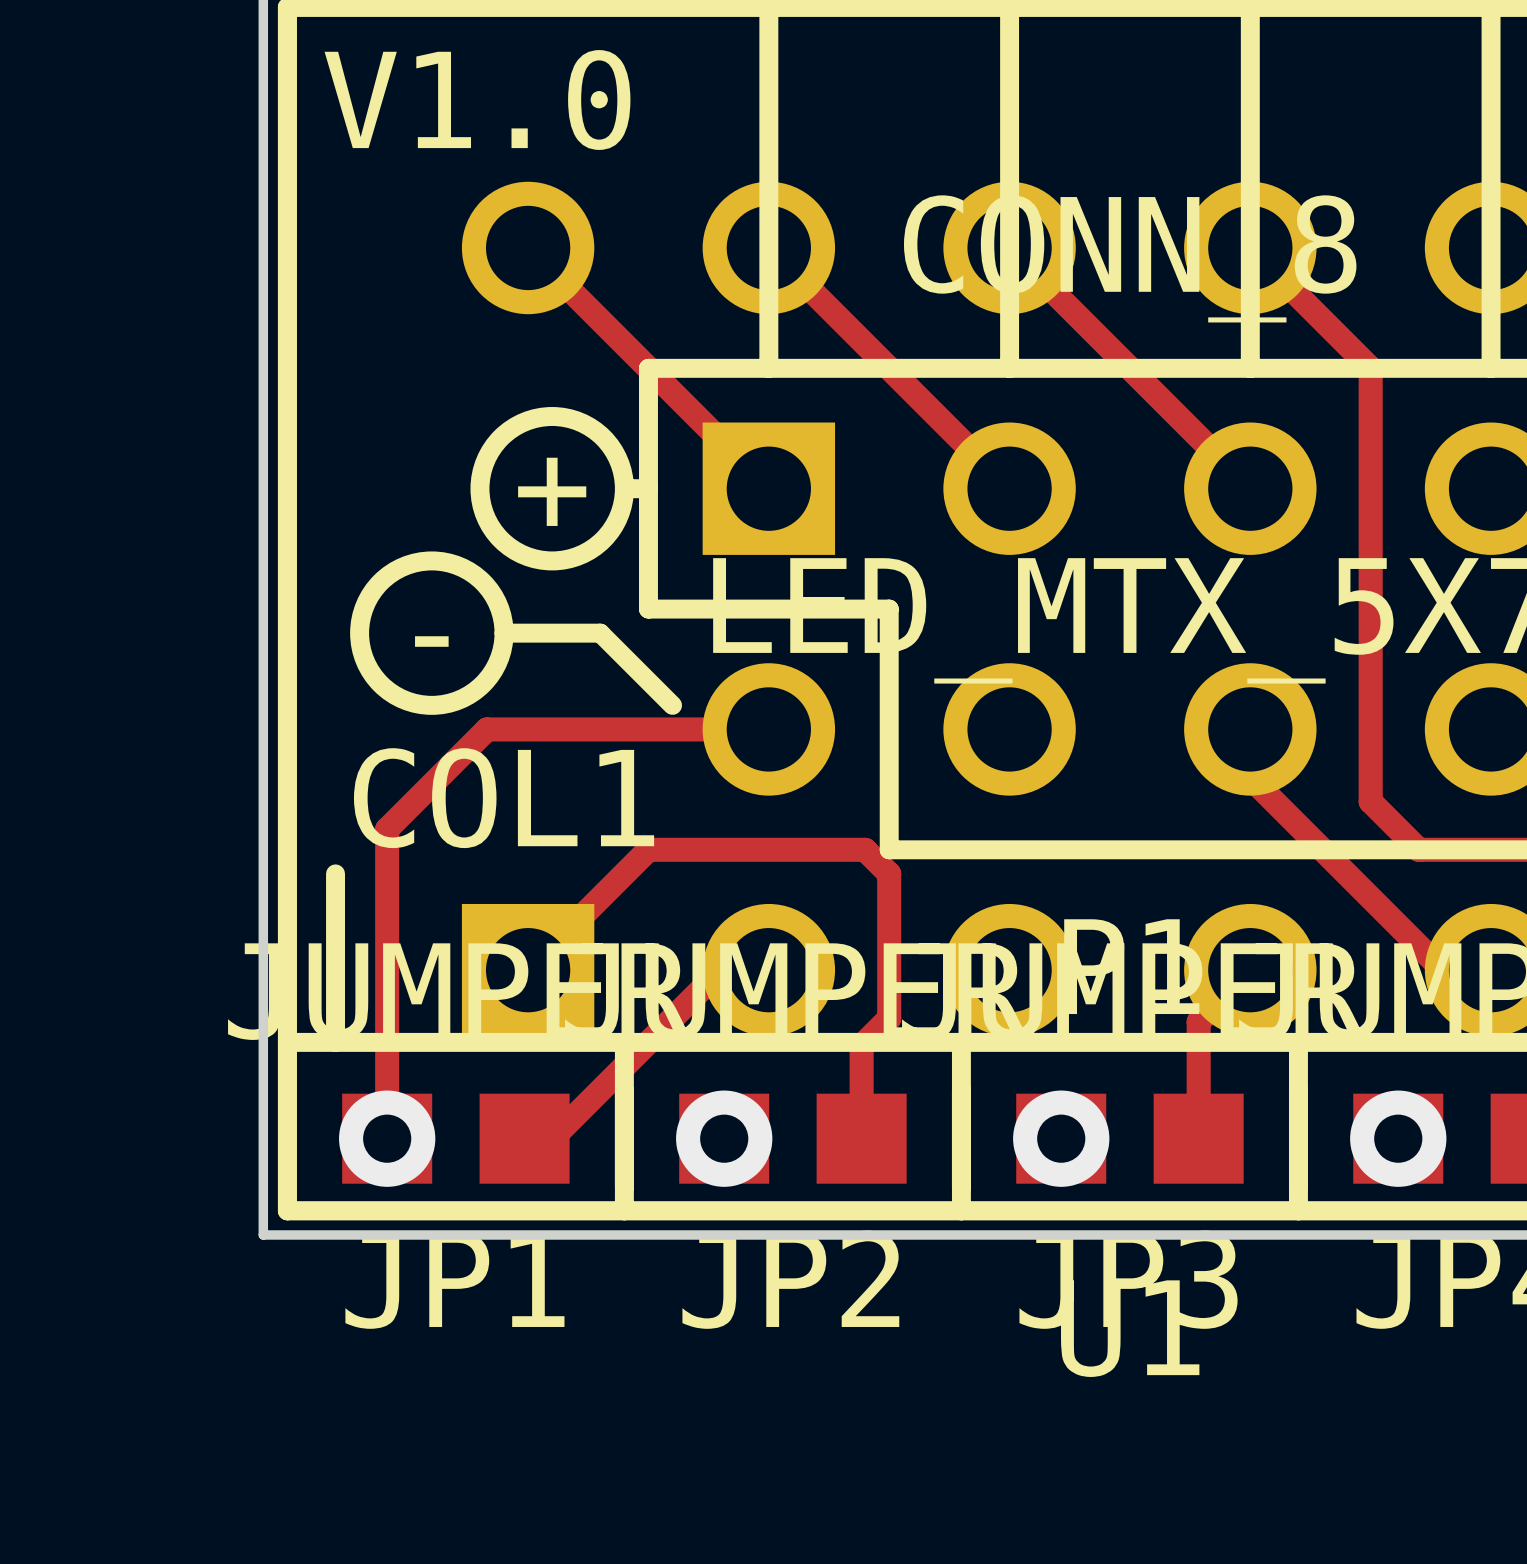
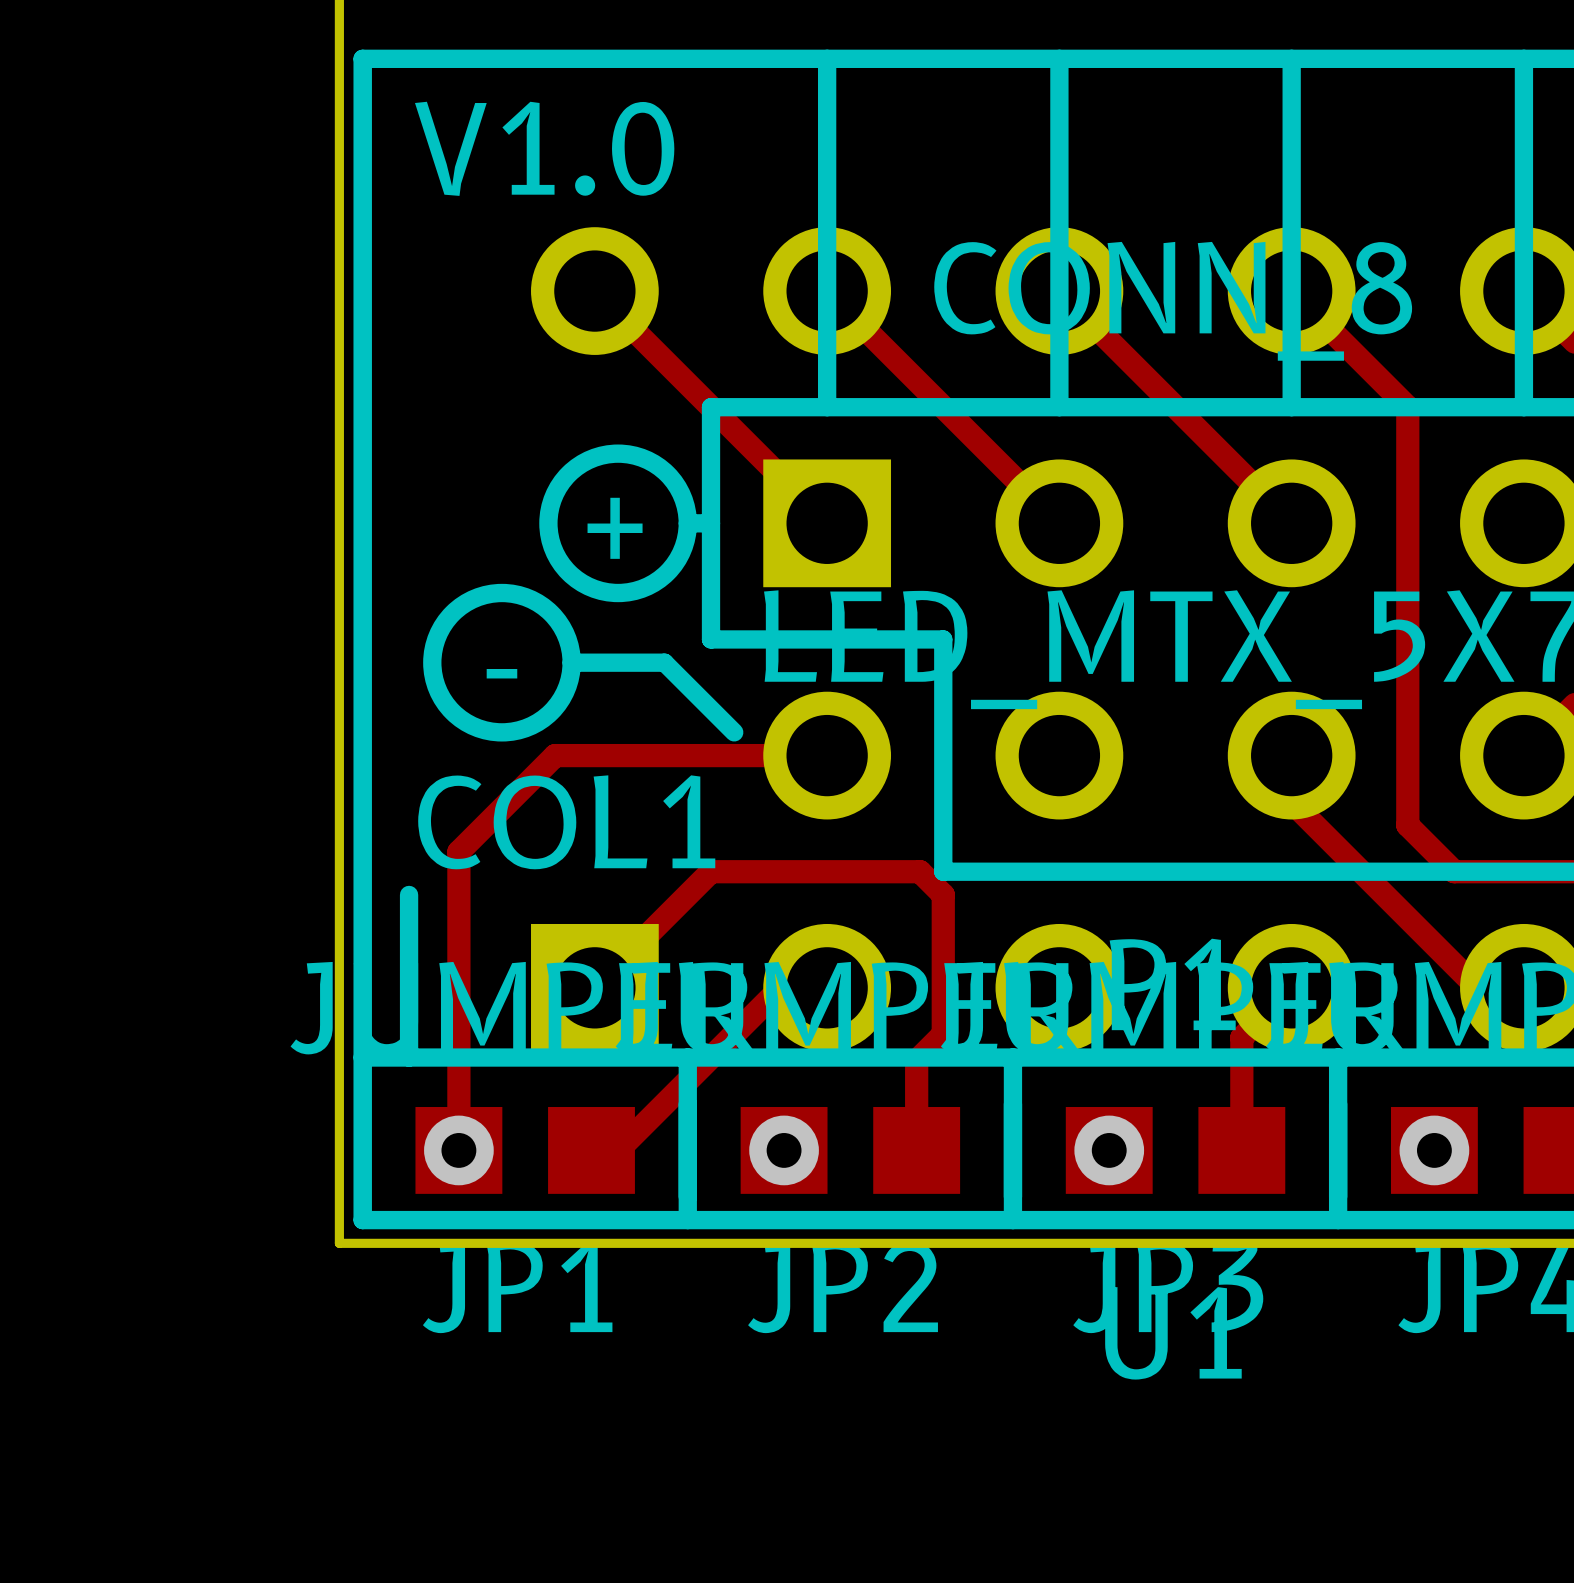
via size: [339, 1090, 436, 1187] -> [424, 1115, 494, 1186]
via size: [676, 1090, 773, 1187] -> [749, 1115, 819, 1186]
via size: [1013, 1090, 1110, 1187] -> [1074, 1115, 1145, 1186]
via size: [1350, 1090, 1447, 1187] -> [1399, 1115, 1470, 1186]

